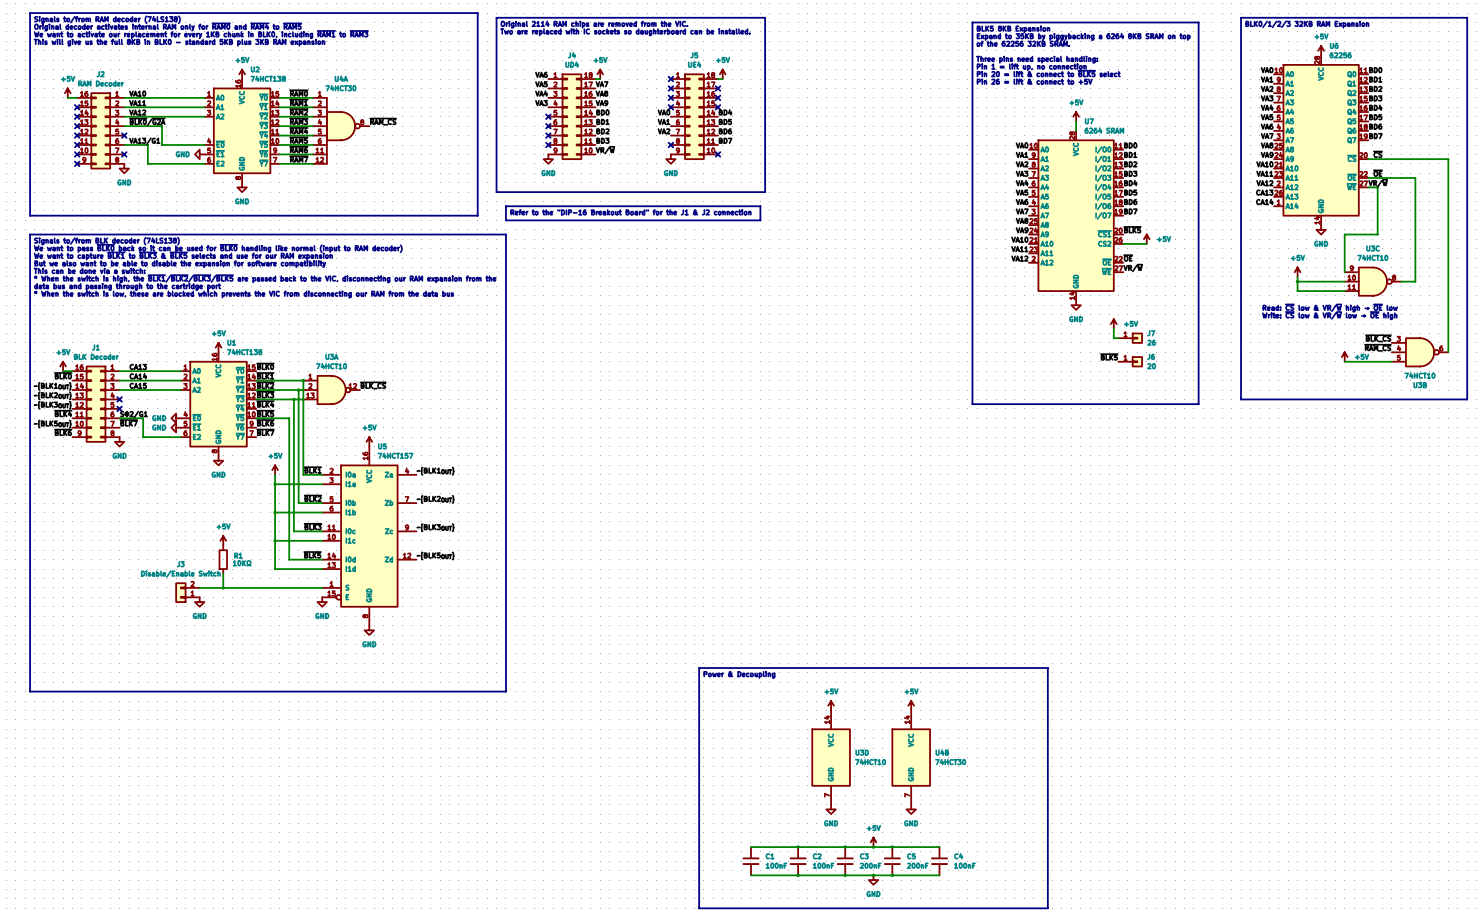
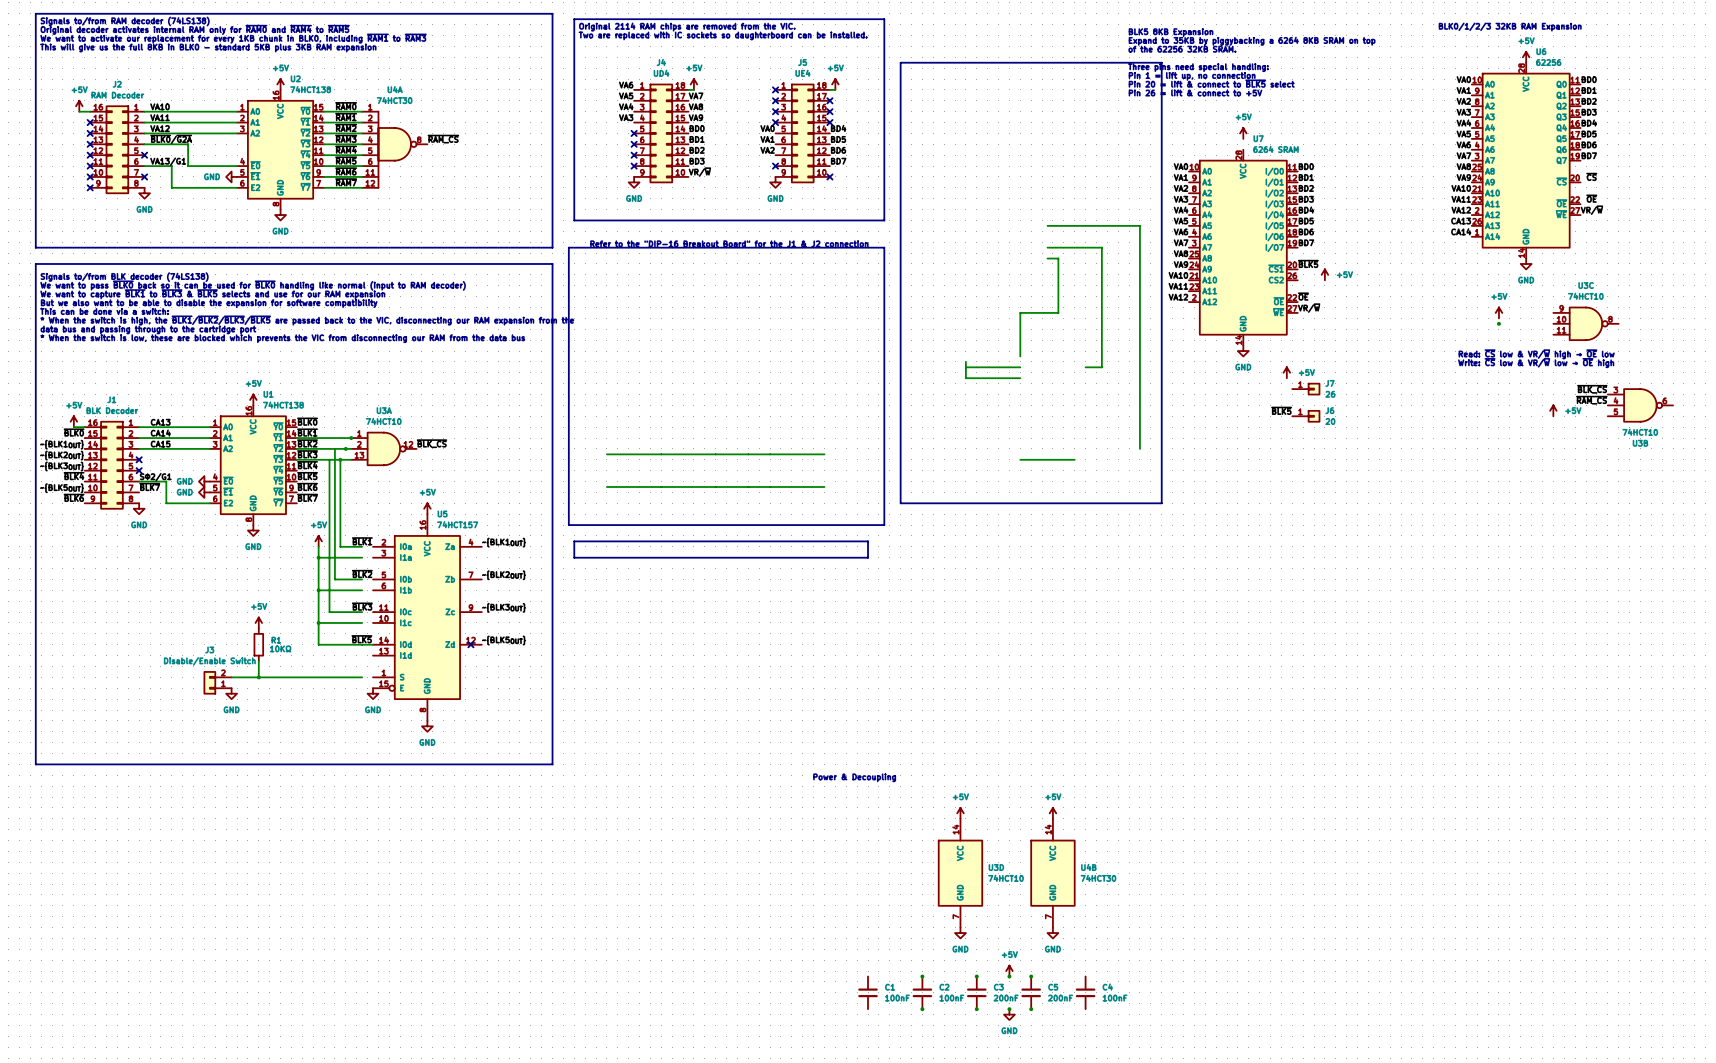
line: (1241, 17) (1467, 17) (1467, 399) (1241, 399) (1241, 17) -> none
line: (972, 22) (1198, 22) (1198, 404) (972, 404) (972, 22) -> none
line: none -> (900, 62) (1161, 62) (1161, 503) (900, 503) (900, 62)
wire: (1076, 121) (1076, 130) -> none
wire: (1368, 159) (1448, 159) (1448, 352) -> none
wire: (1368, 177) (1415, 177) (1415, 281) (1401, 281) -> none
wire: (1368, 187) (1377, 187) (1377, 234) (1344, 234) (1344, 272) -> none
wire: none -> (1047, 225) (1139, 225) (1139, 448)
line: (505, 206) (760, 206) (760, 220) (505, 220) (505, 206) -> none
line: none -> (568, 247) (884, 247) (884, 525) (568, 525) (568, 247)
wire: none -> (1047, 247) (1101, 247) (1101, 367) (1085, 367)
wire: none -> (1047, 258) (1058, 258) (1058, 312) (1020, 312) (1020, 356)
line: (30, 234) (505, 234) (505, 691) (30, 691) (30, 663) -> (35, 269) (35, 263) (552, 263) (552, 764) (35, 764)
wire: (1123, 243) (1146, 243) -> none
wire: (1297, 276) (1297, 291) (1344, 291) -> none
wire: (1297, 281) (1344, 281) -> none
wire: none -> (965, 361) (965, 378) (1020, 378)
wire: none -> (965, 367) (1020, 367)
wire: (1113, 328) (1113, 338) (1118, 338) -> none
wire: (1344, 361) (1391, 361) -> none
wire: (303, 380) (303, 474) -> none
wire: (298, 390) (298, 503) -> none
wire: none -> (606, 454) (824, 454)
wire: none -> (329, 459) (329, 612) (340, 612)
wire: none -> (1020, 459) (1074, 459)
wire: (256, 418) (289, 418) -> (334, 448) (334, 481)
wire: none -> (606, 487) (824, 487)
line: none -> (574, 541) (868, 541) (868, 557) (574, 557) (574, 541)
wire: (293, 474) (293, 531) -> (340, 546) (351, 546)
wire: (312, 474) (322, 474) -> none
wire: (312, 484) (322, 484) -> none
wire: (289, 503) (289, 559) -> (334, 579) (345, 579)
wire: (312, 503) (322, 503) -> none
wire: (312, 512) (322, 512) -> none
wire: (312, 531) (322, 531) -> none
wire: (312, 540) (322, 540) -> none
wire: (275, 559) (275, 569) (322, 569) -> (318, 644) (334, 644)
no-connect mark: none -> (470, 644)
wire: (312, 587) (322, 587) -> none
line: (699, 668) (1047, 668) (1047, 908) (699, 908) (699, 668) -> none
wire: (750, 847) (939, 847) -> none
wire: (750, 875) (939, 875) -> none

